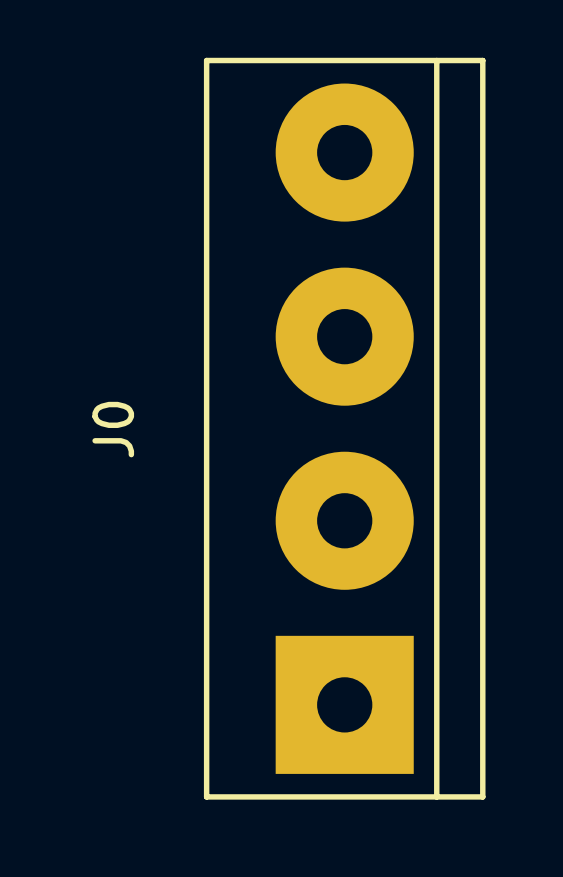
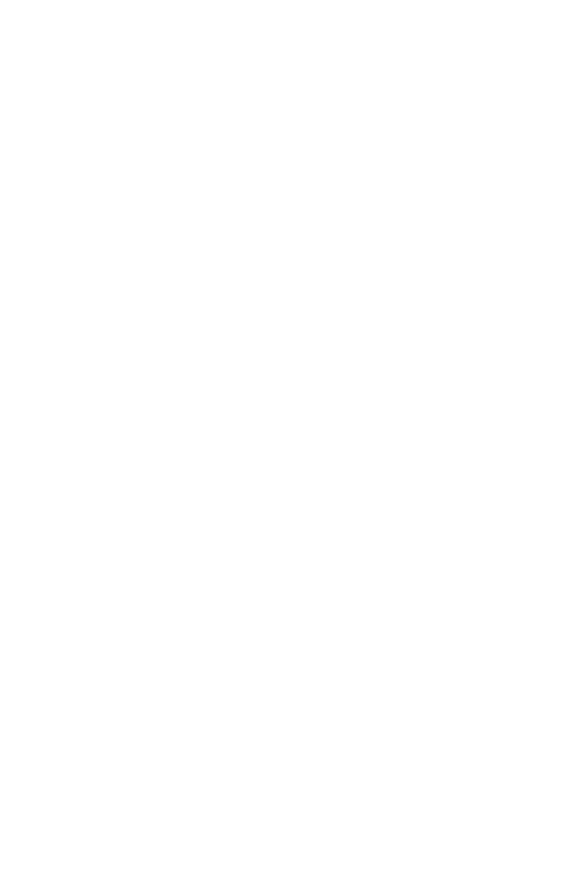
J0: (344, 428) -> none

